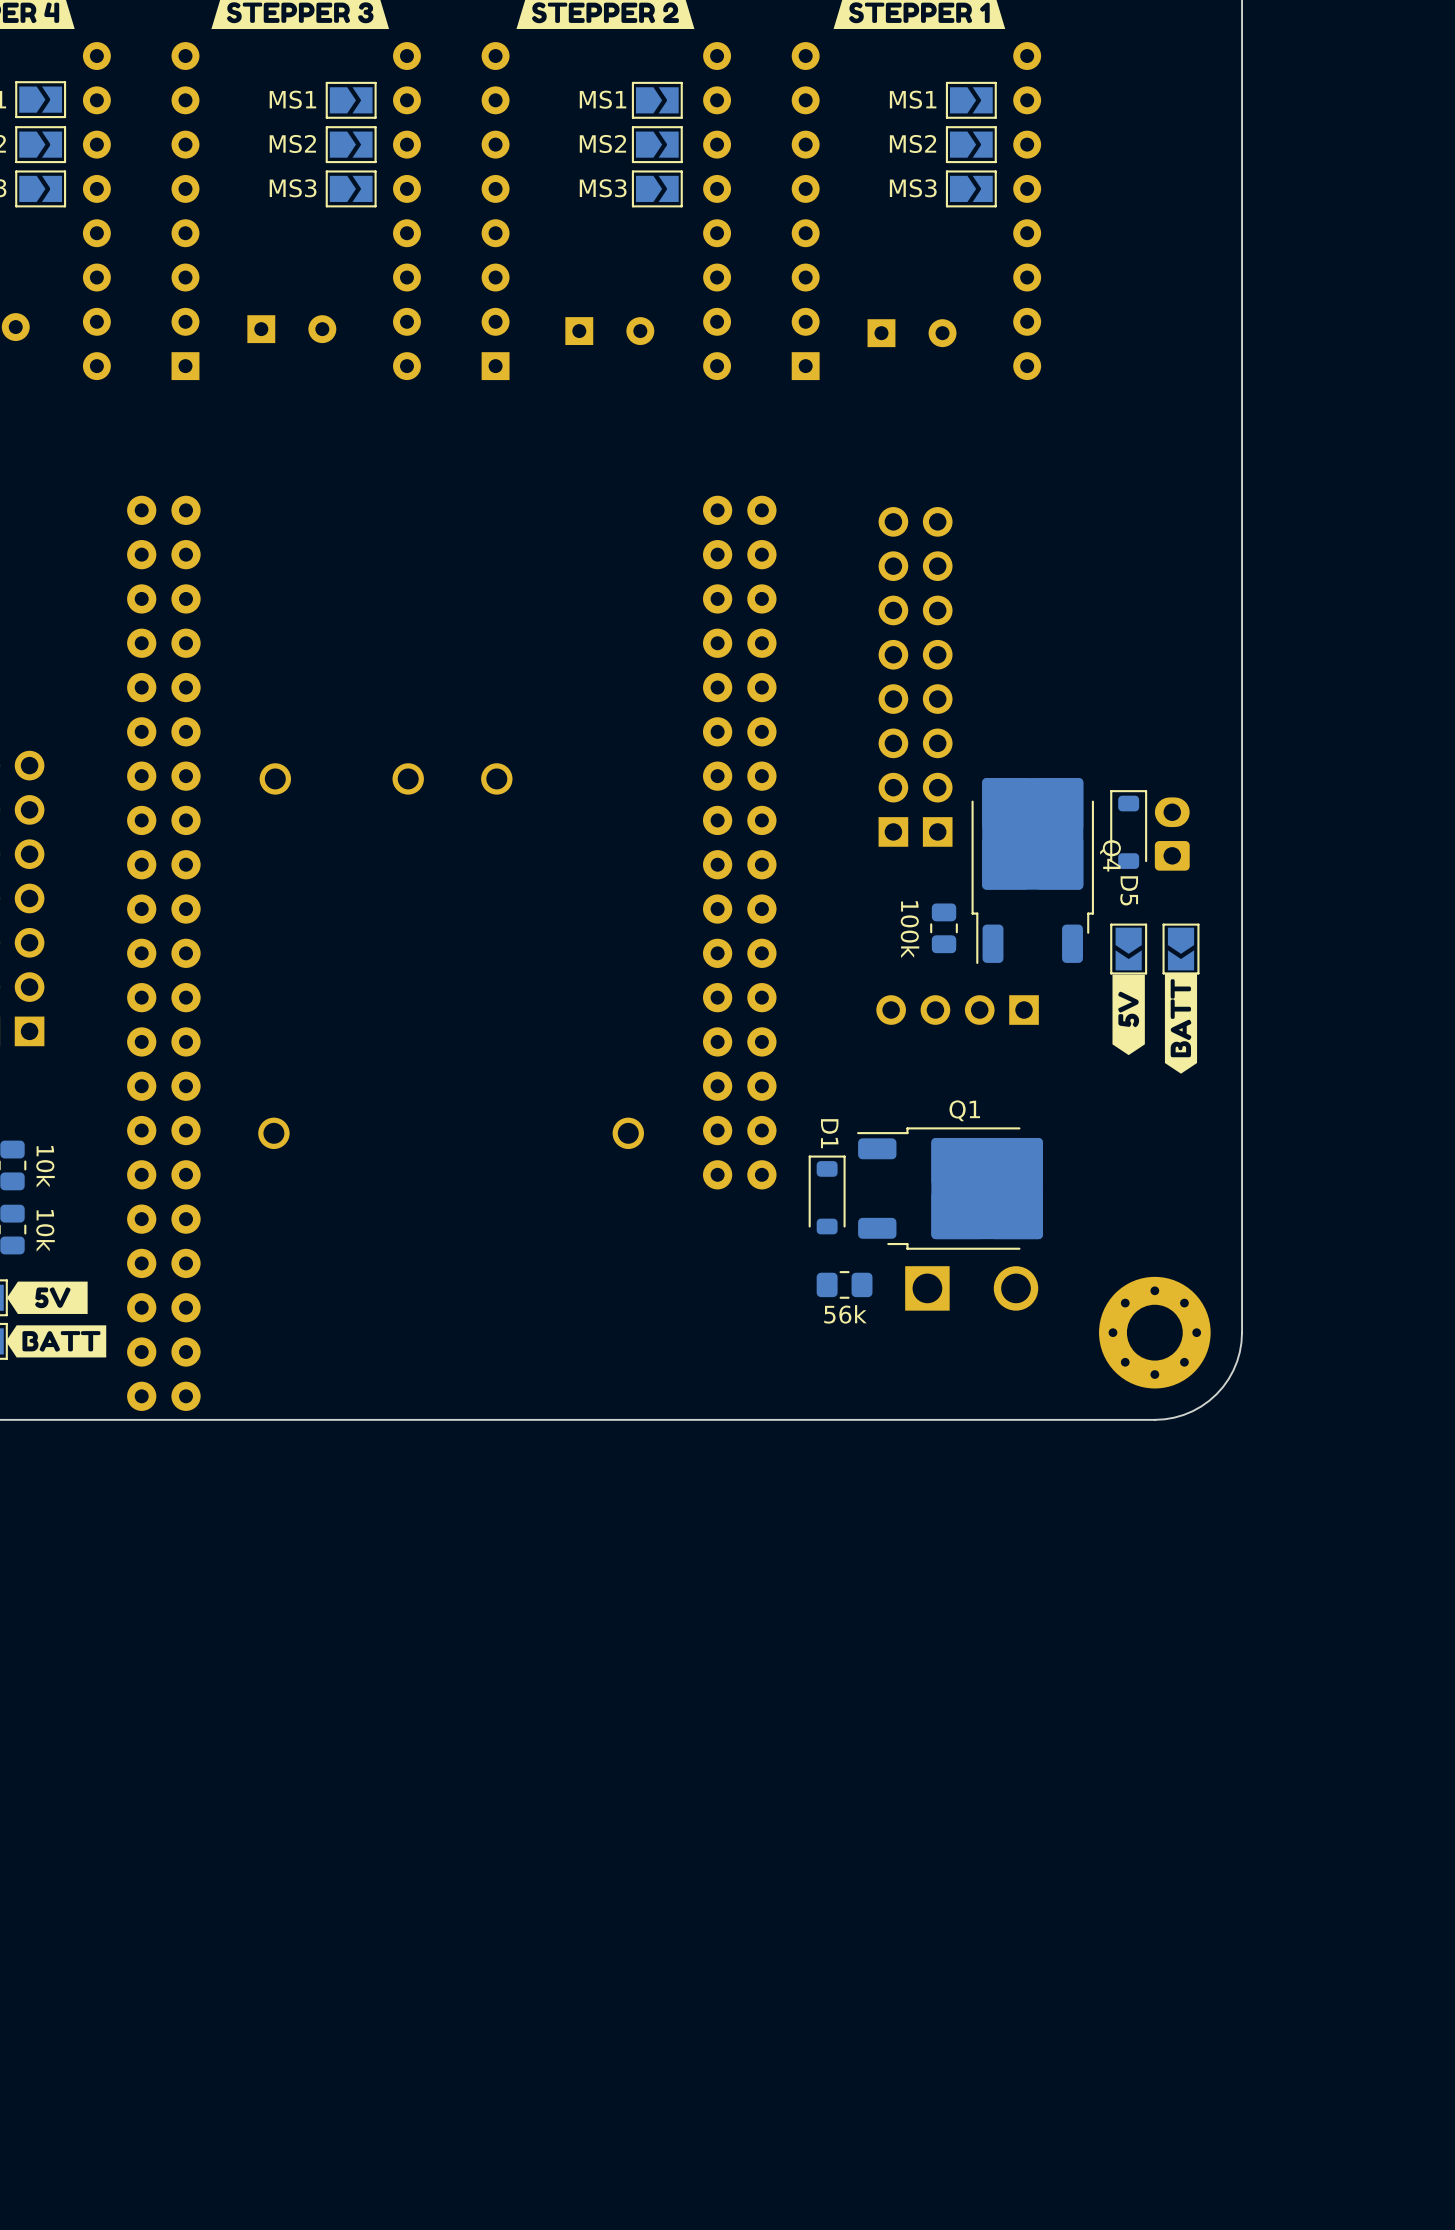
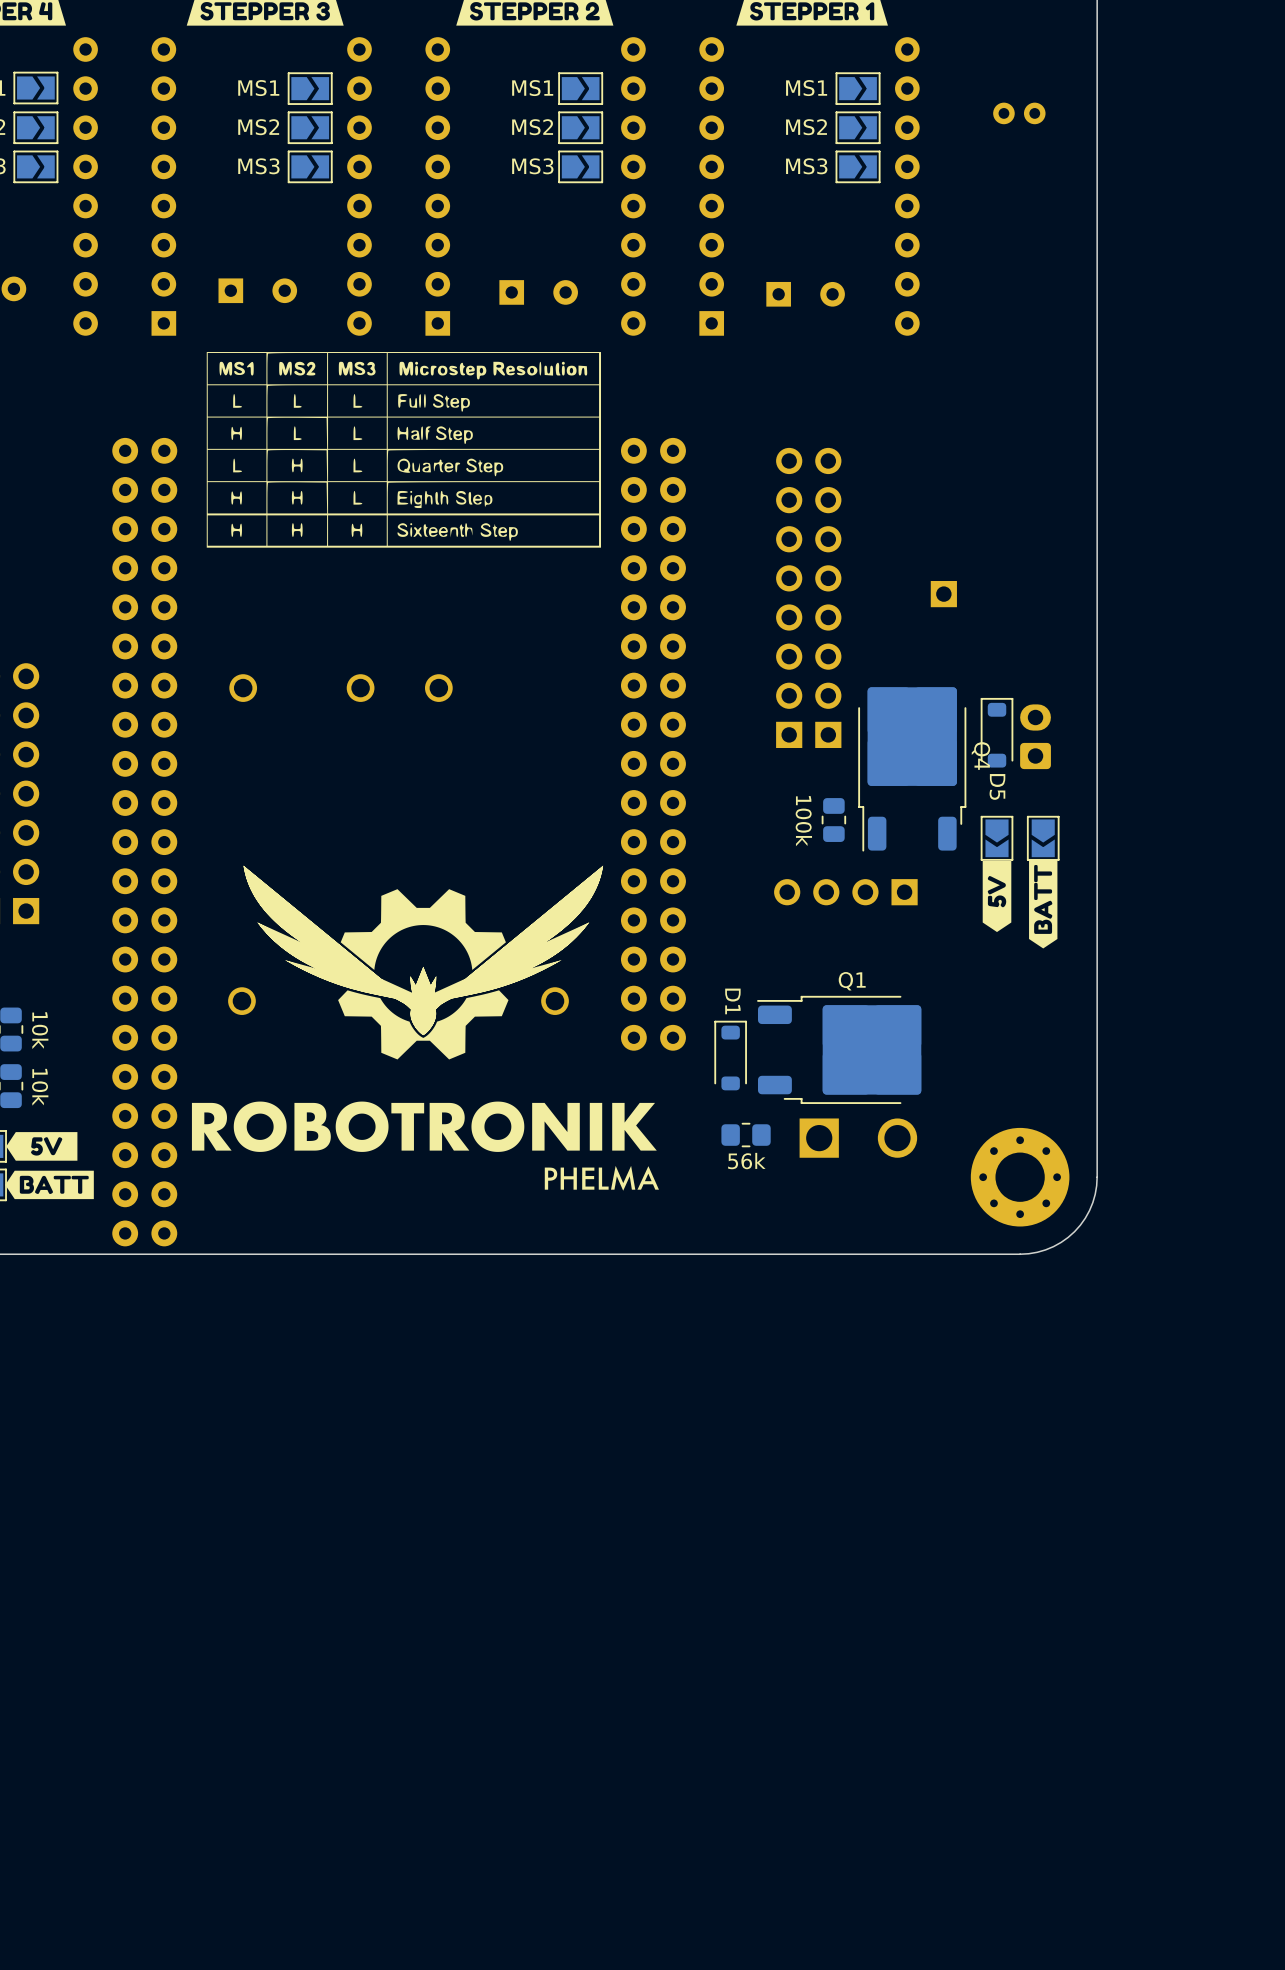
part: none -> (1019, 113)
drawing: none -> [206, 352, 602, 548]
part: none -> (943, 594)
drawing: none -> [191, 865, 659, 1191]

